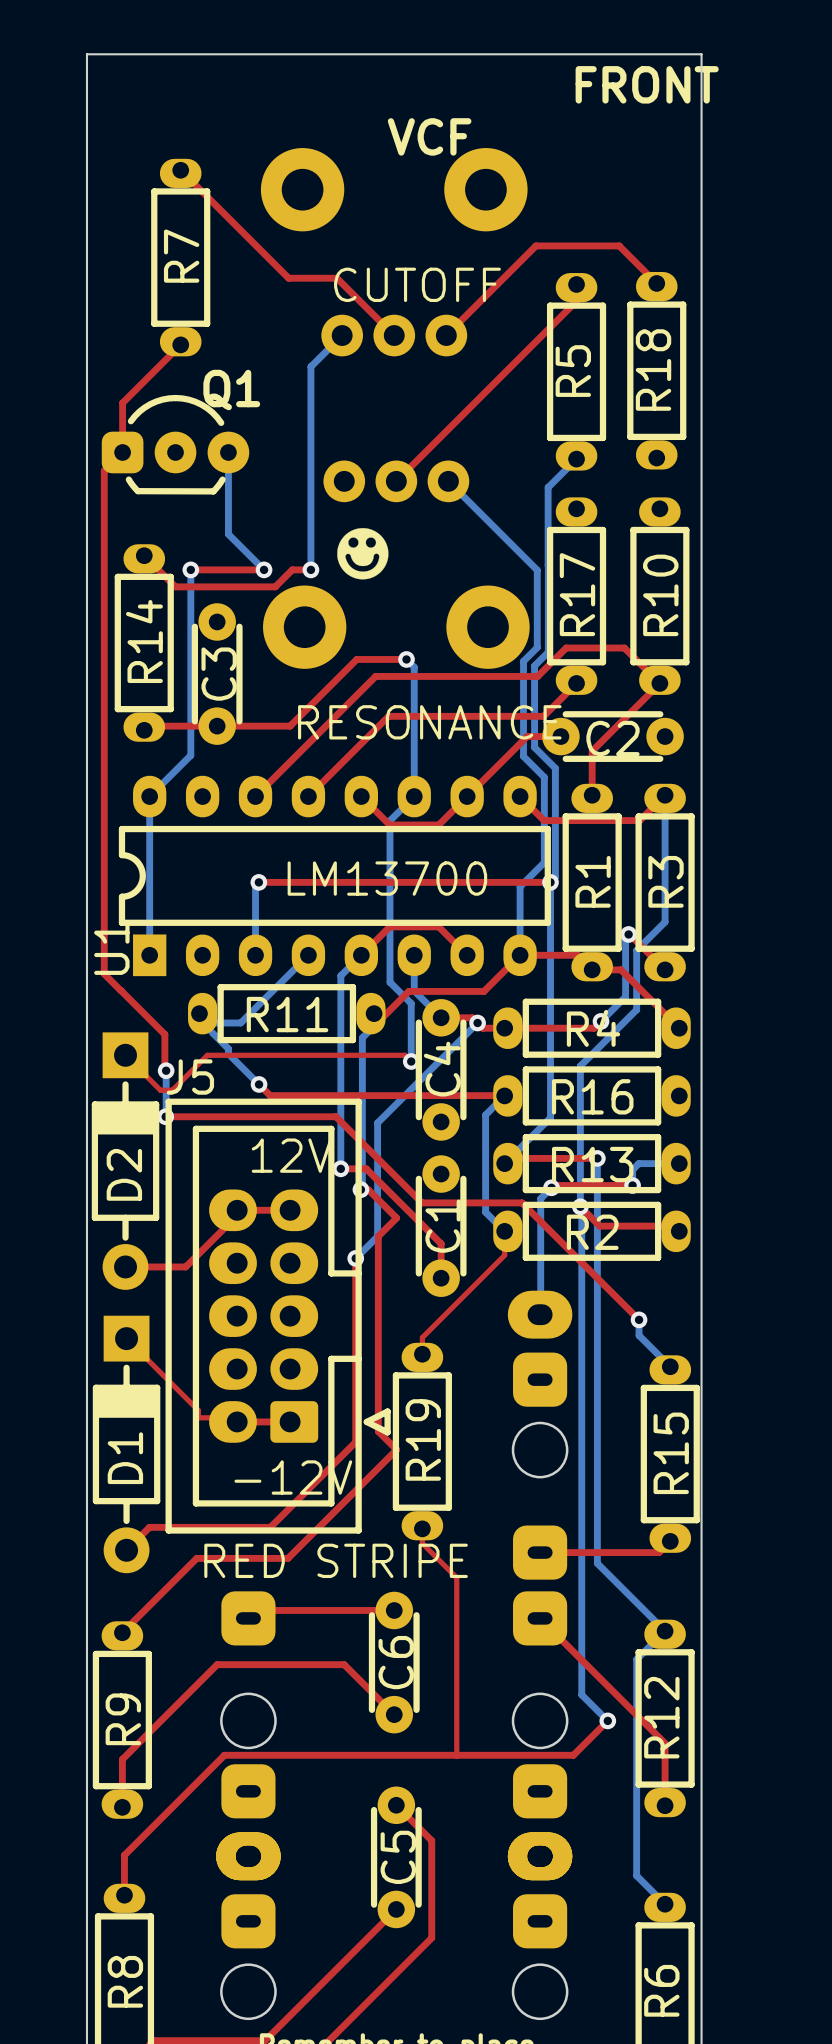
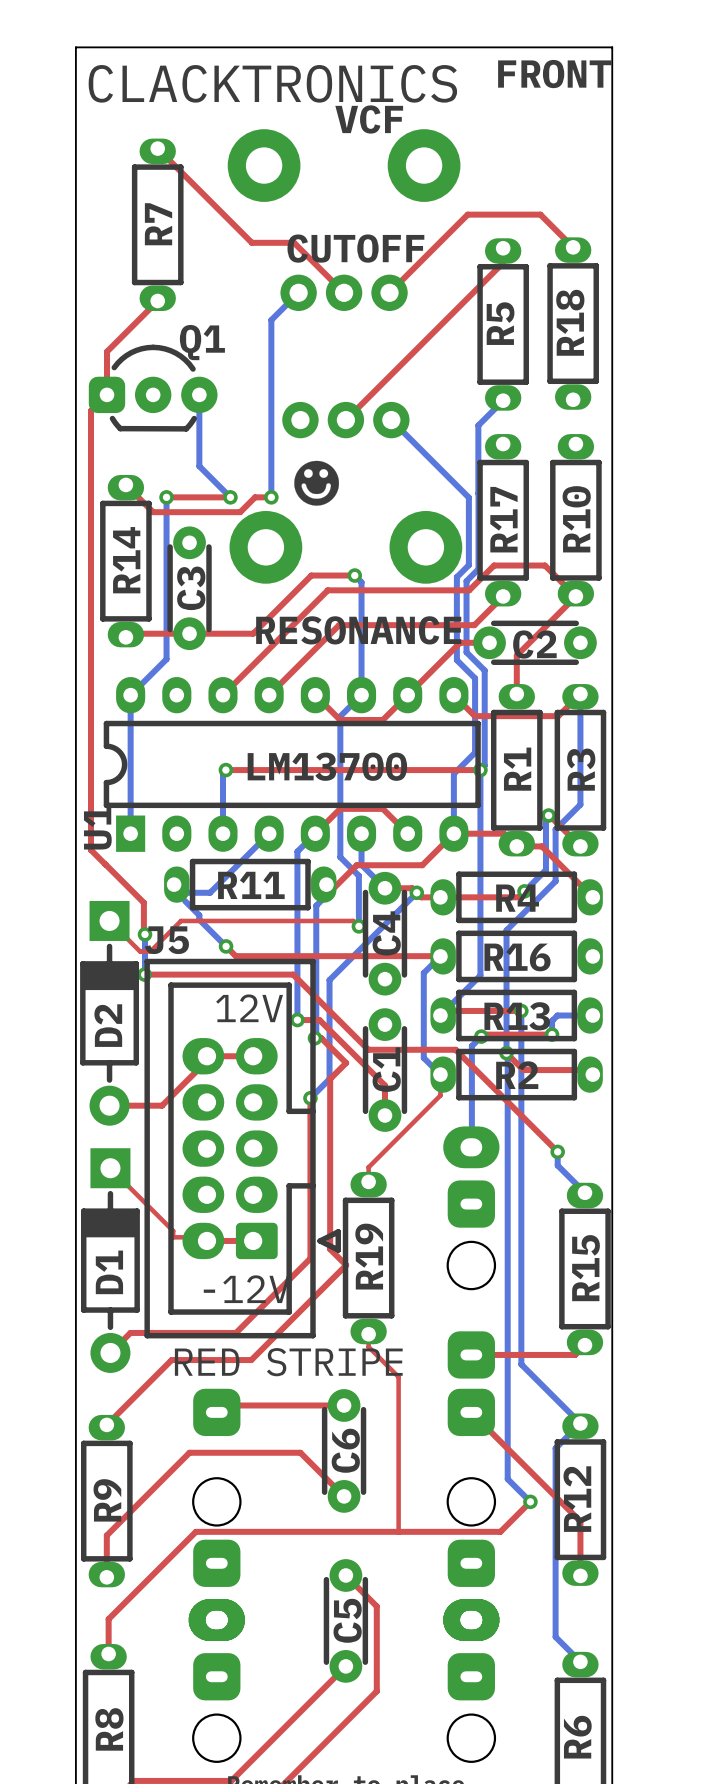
text: none -> CLACKTRONICS (272, 83)

